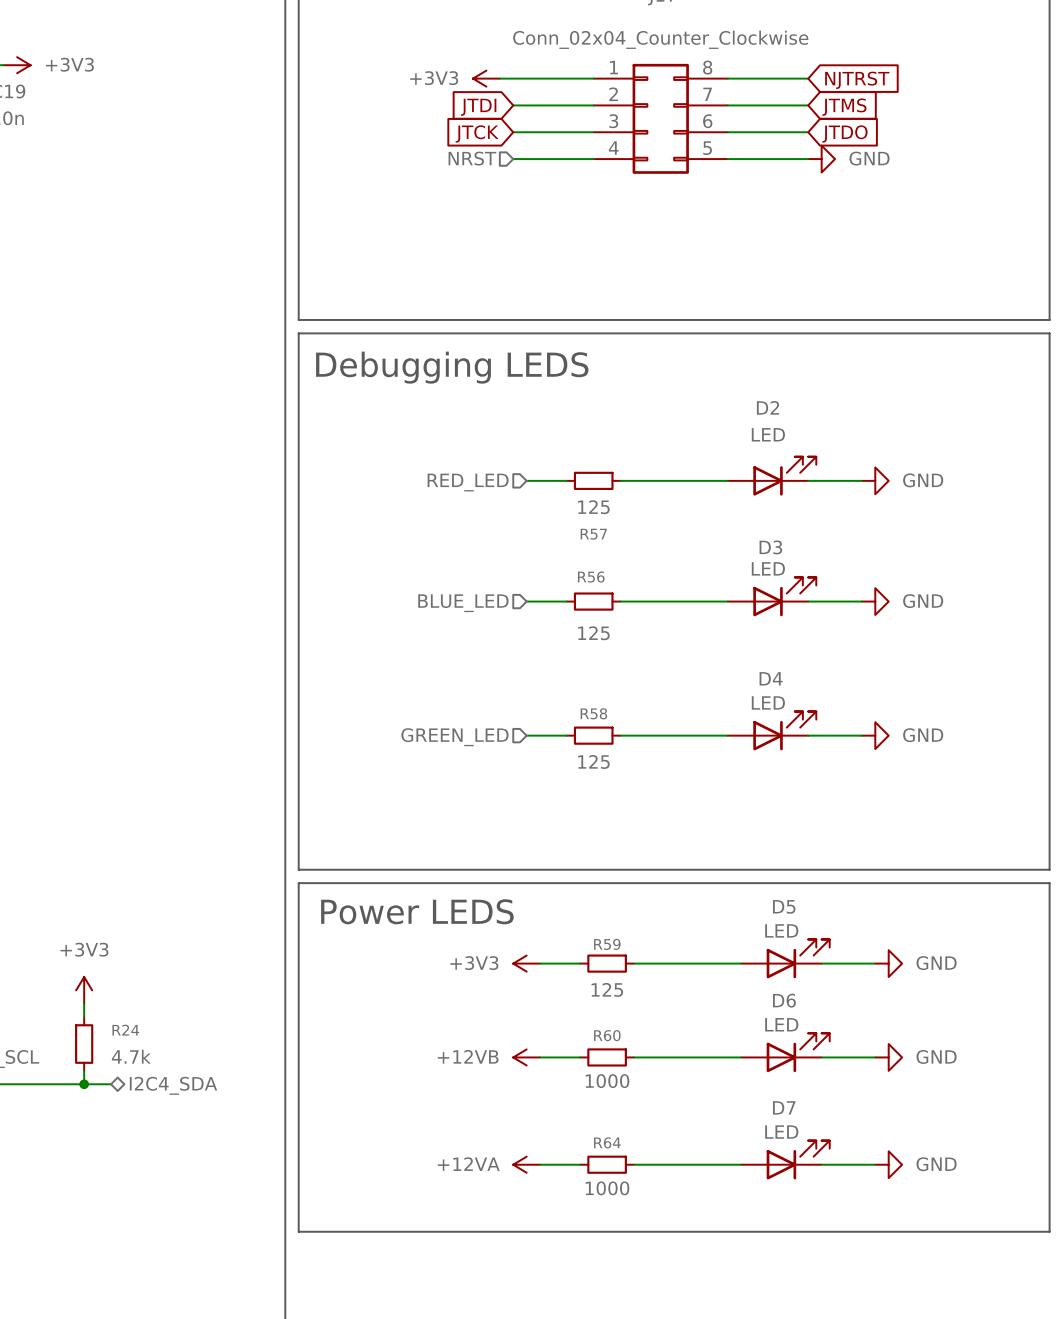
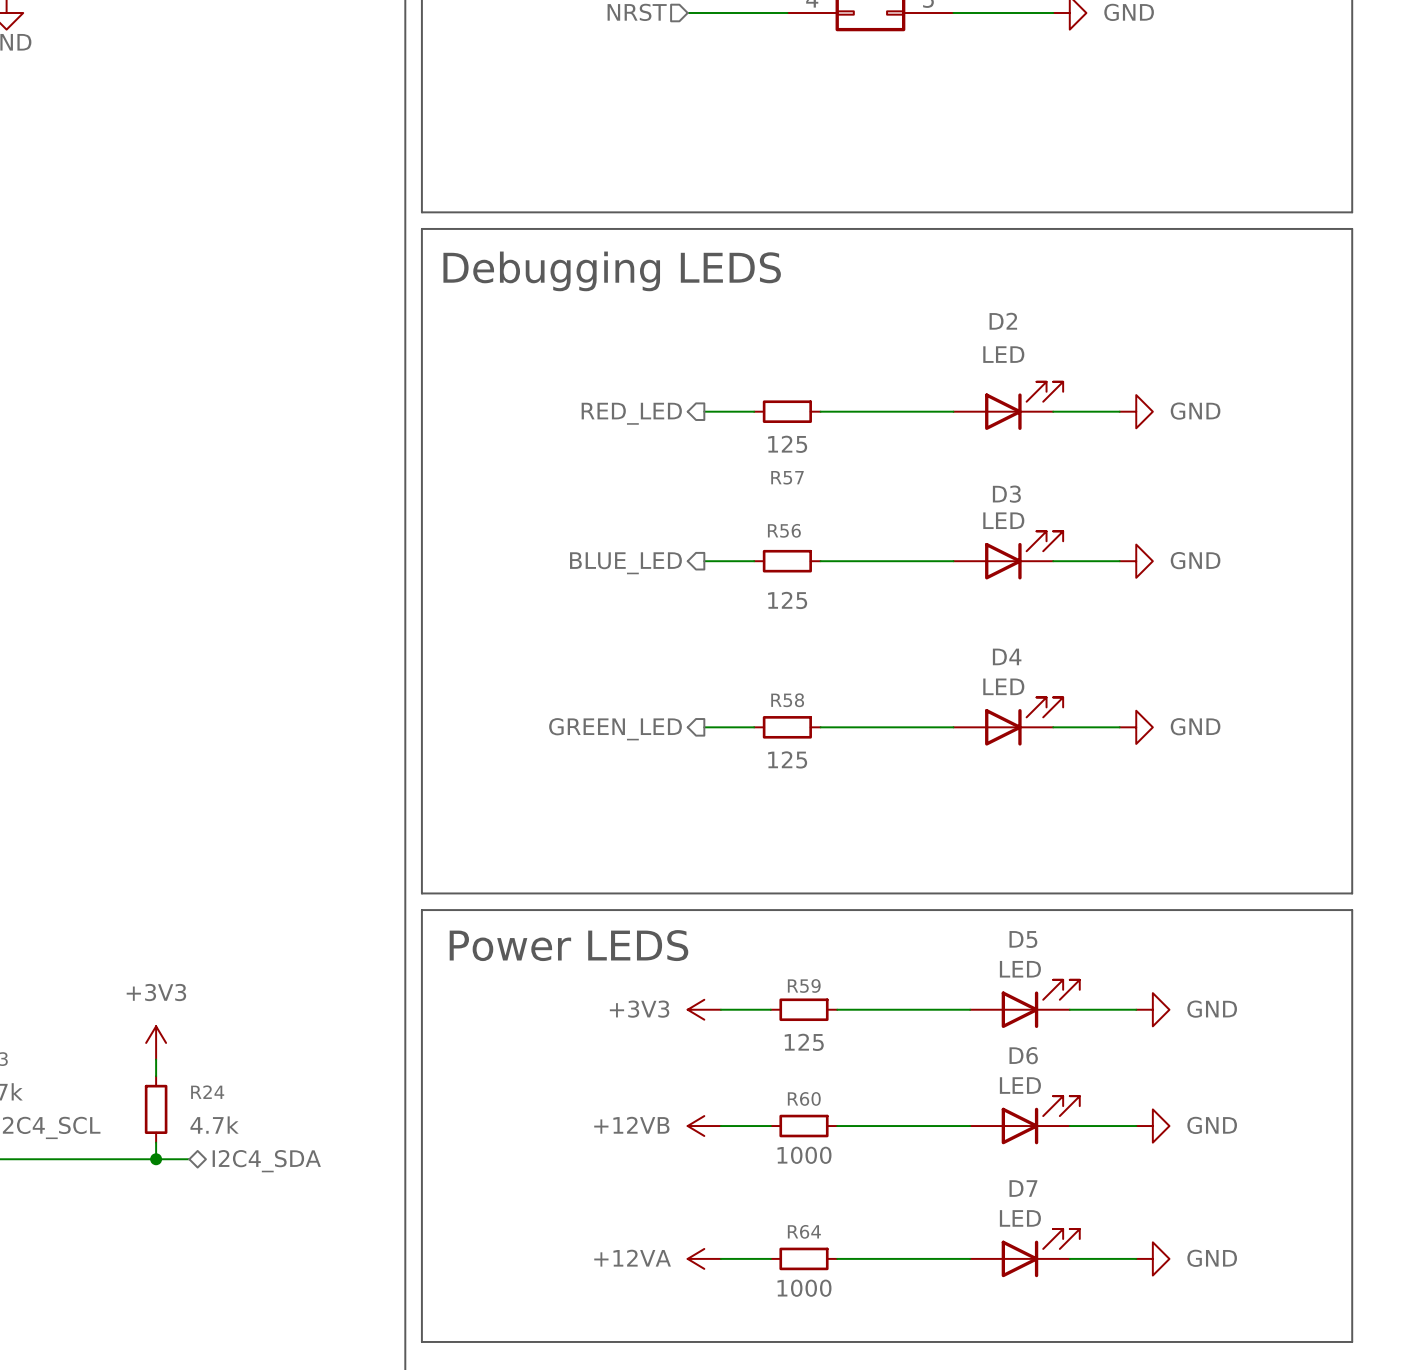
hierarchical label shape: input (468, 482) -> output (631, 413)
hierarchical label shape: input (463, 603) -> output (625, 563)
hierarchical label shape: input (454, 737) -> output (615, 729)

